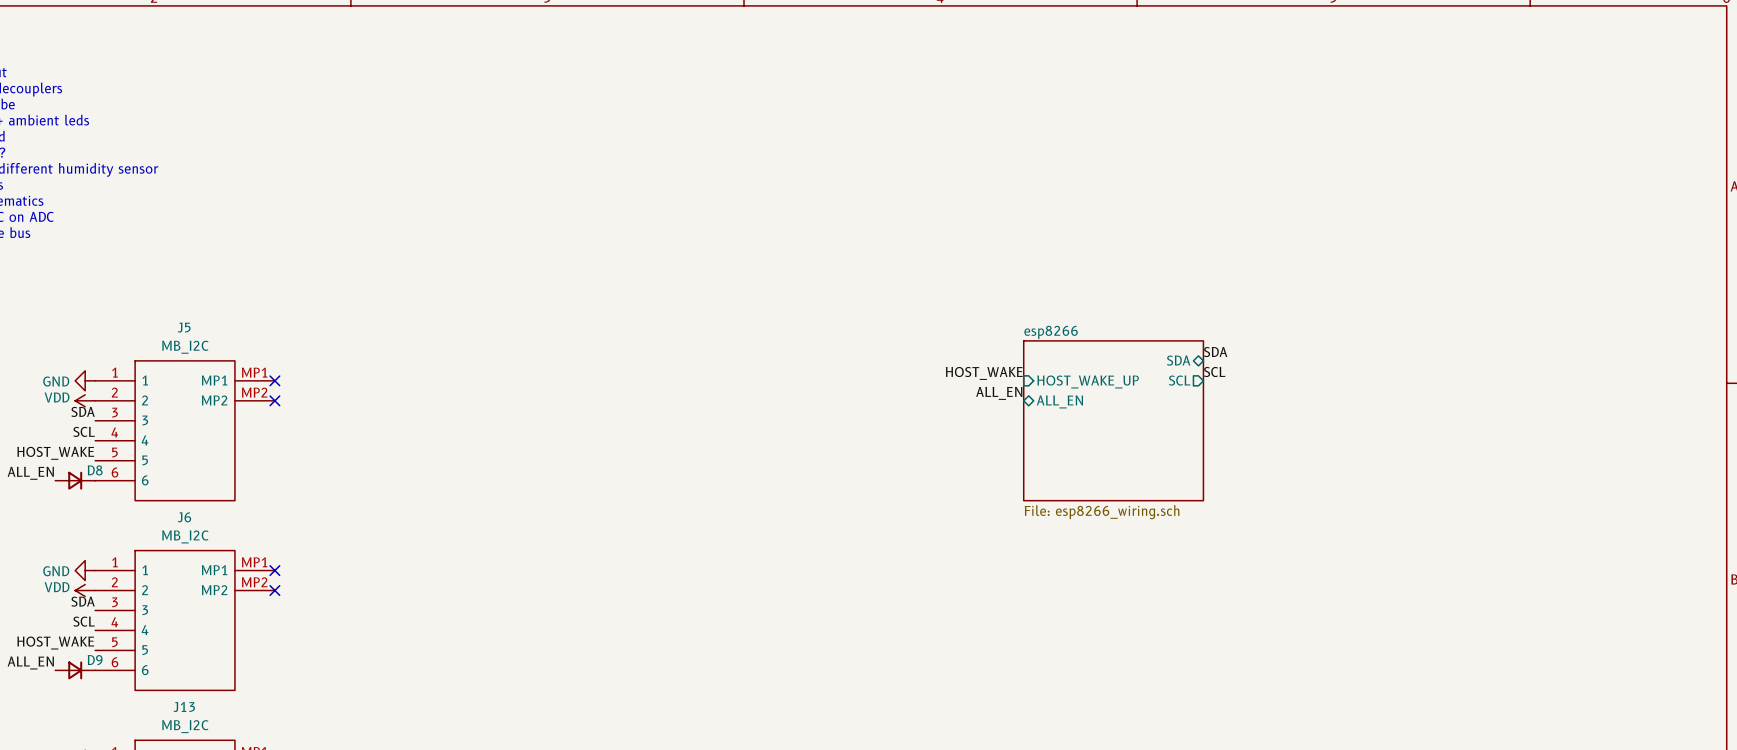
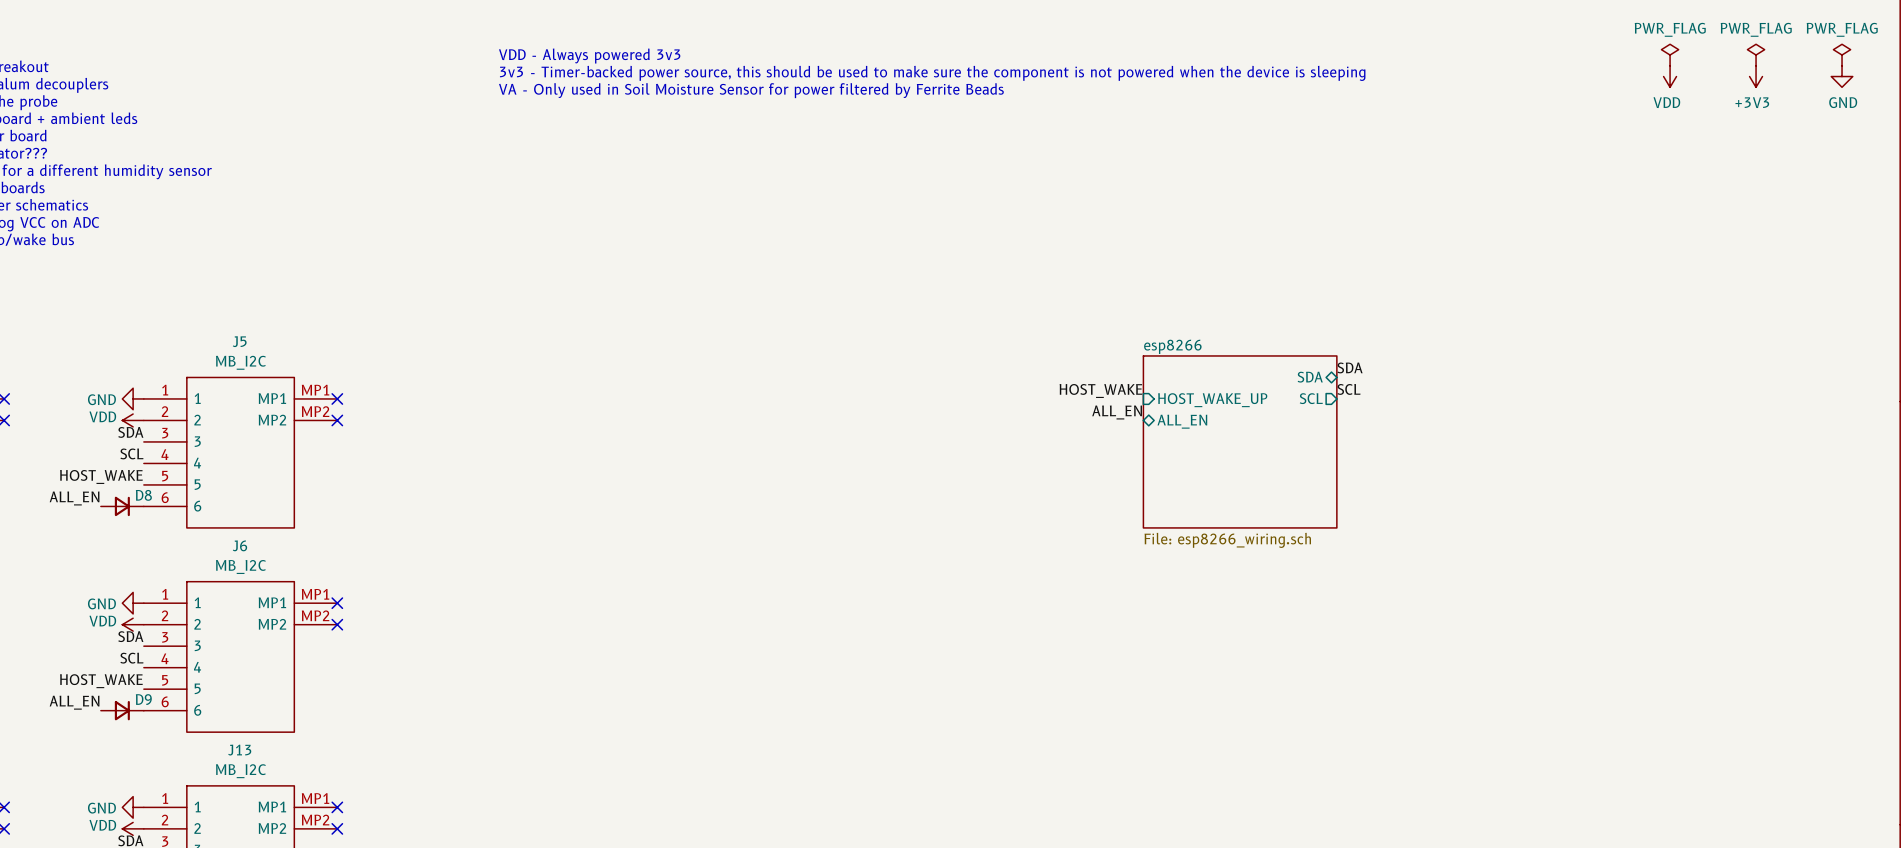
power symbol: none -> PWR_FLAG (1670, 55)
power symbol: none -> PWR_FLAG (1756, 55)
power symbol: none -> PWR_FLAG (1842, 55)
text: none -> VDD - Always powered 3v3 (589, 56)
text: none -> 3v3 - Timer-backed power source, this should be used to make sure the component is not powered when the device is sleeping (932, 73)
power symbol: none -> VDD (1670, 76)
power symbol: none -> +3V3 (1756, 76)
power symbol: none -> GND (1842, 76)
text: none -> VA - Only used in Soil Moisture Sensor for power filtered by Ferrite Beads (751, 90)

